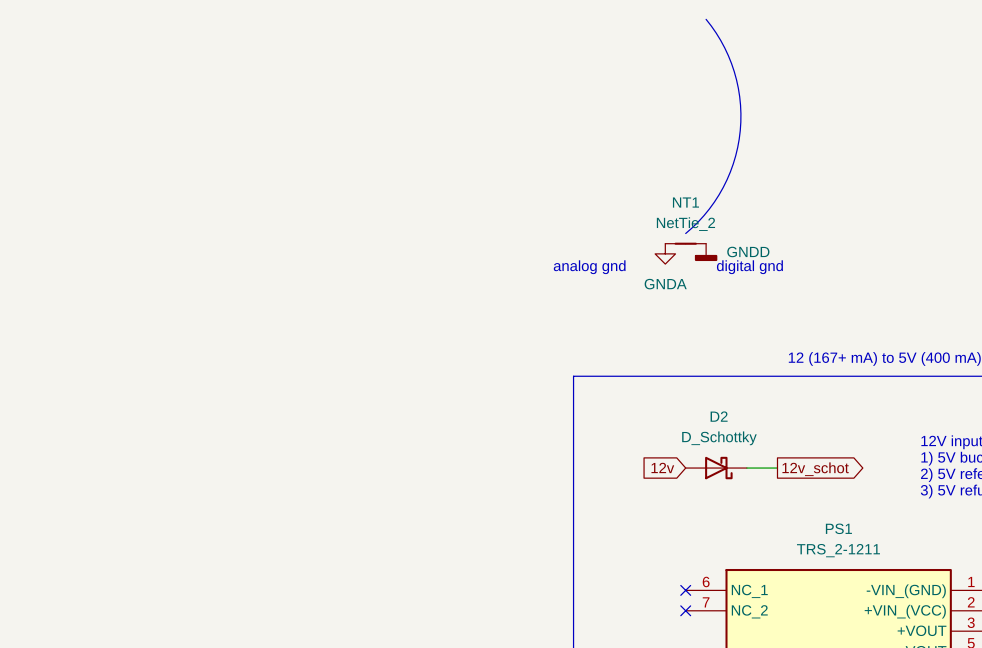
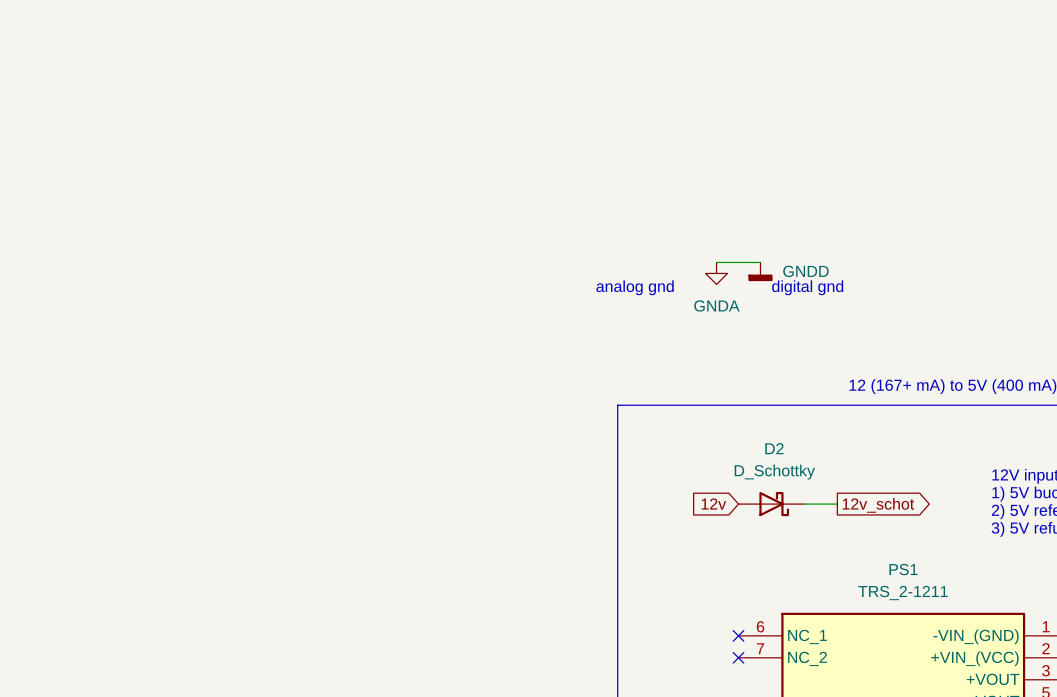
line: (706, 19) (720, 40) (734, 71) (739, 96) (740, 130) (733, 163) (723, 187) (709, 209) (685, 233) -> none
NT1: NetTie_2 (685, 243) -> none

